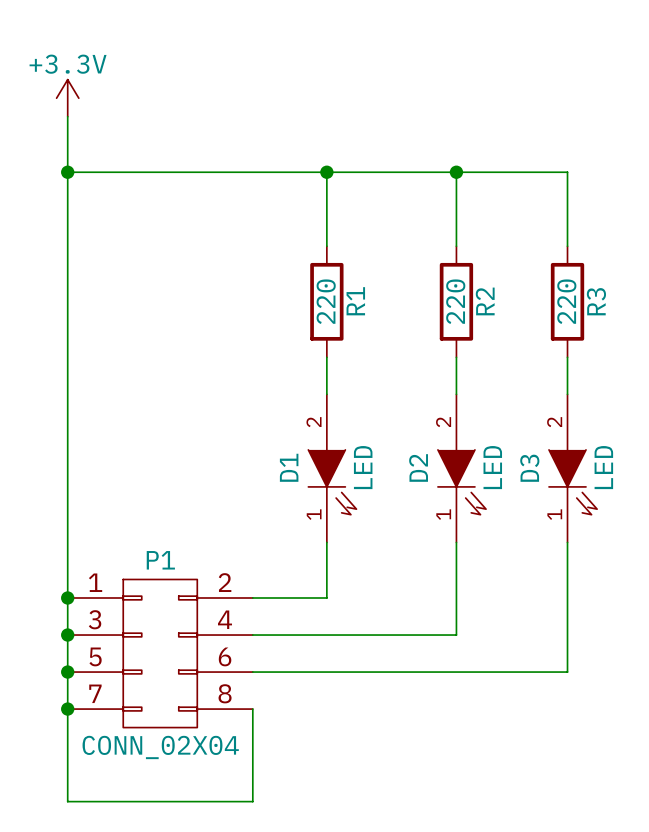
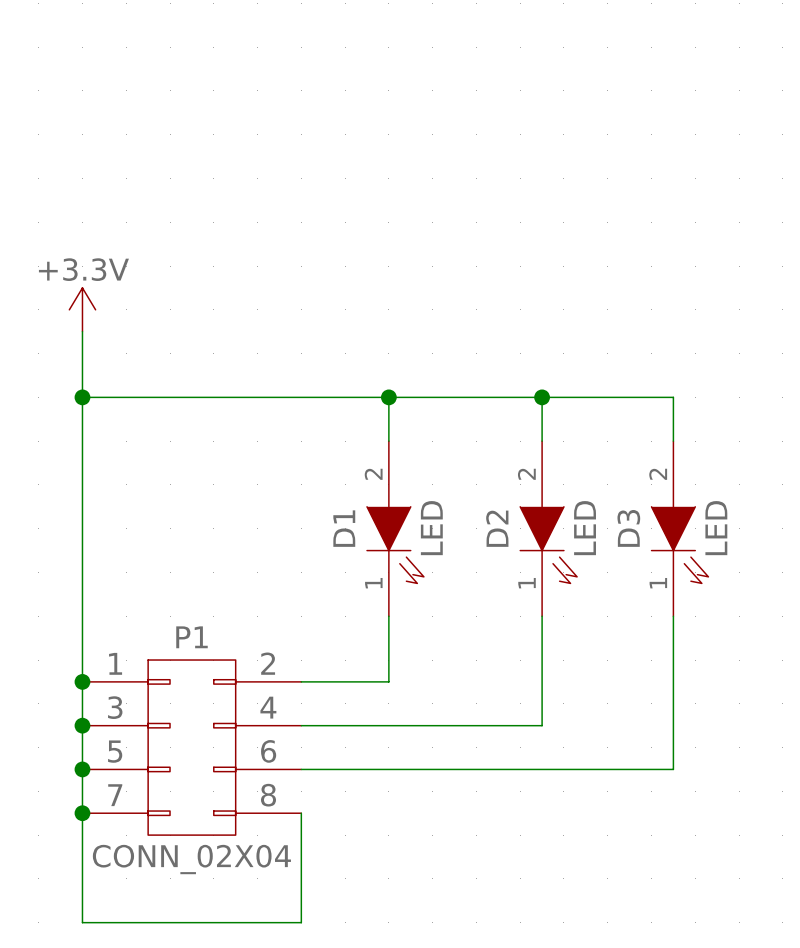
power symbol position: +3.3V (67, 98) -> +3.3V (82, 309)
wire: (67, 116) (67, 301) -> none
wire: (67, 172) (567, 172) (567, 246) -> none
junction: (67, 172) -> none
wire: (326, 172) (326, 246) -> none
junction: (326, 172) -> none
wire: (456, 172) (456, 246) -> none
junction: (456, 172) -> none
R1: 220 (326, 301) -> none
R2: 220 (456, 301) -> none
R3: 220 (567, 301) -> none
wire: none -> (82, 397) (673, 397)
junction: none -> (82, 397)
junction: none -> (388, 397)
junction: none -> (542, 397)

